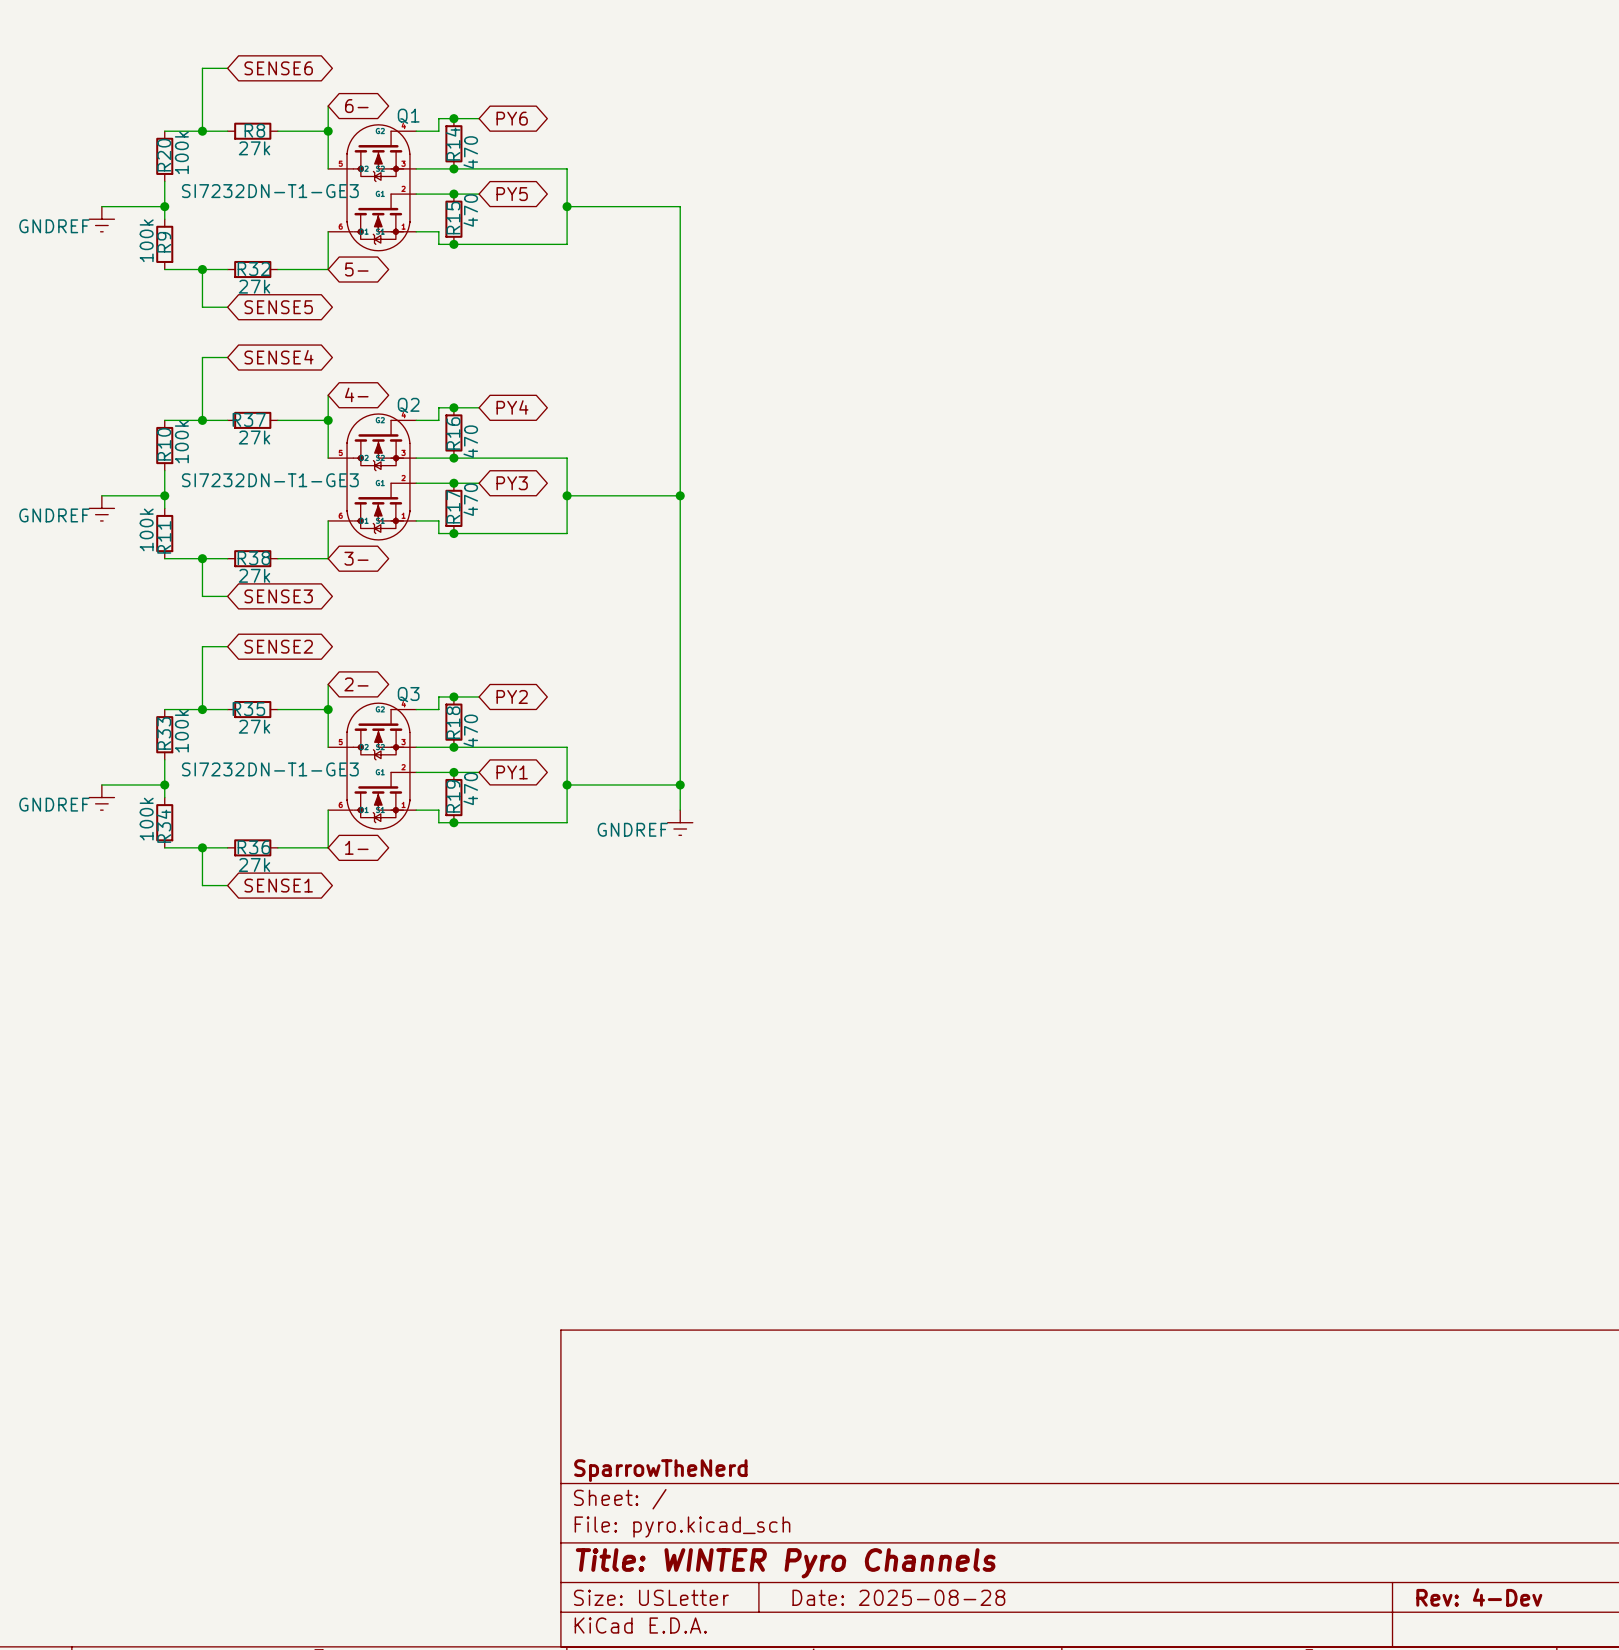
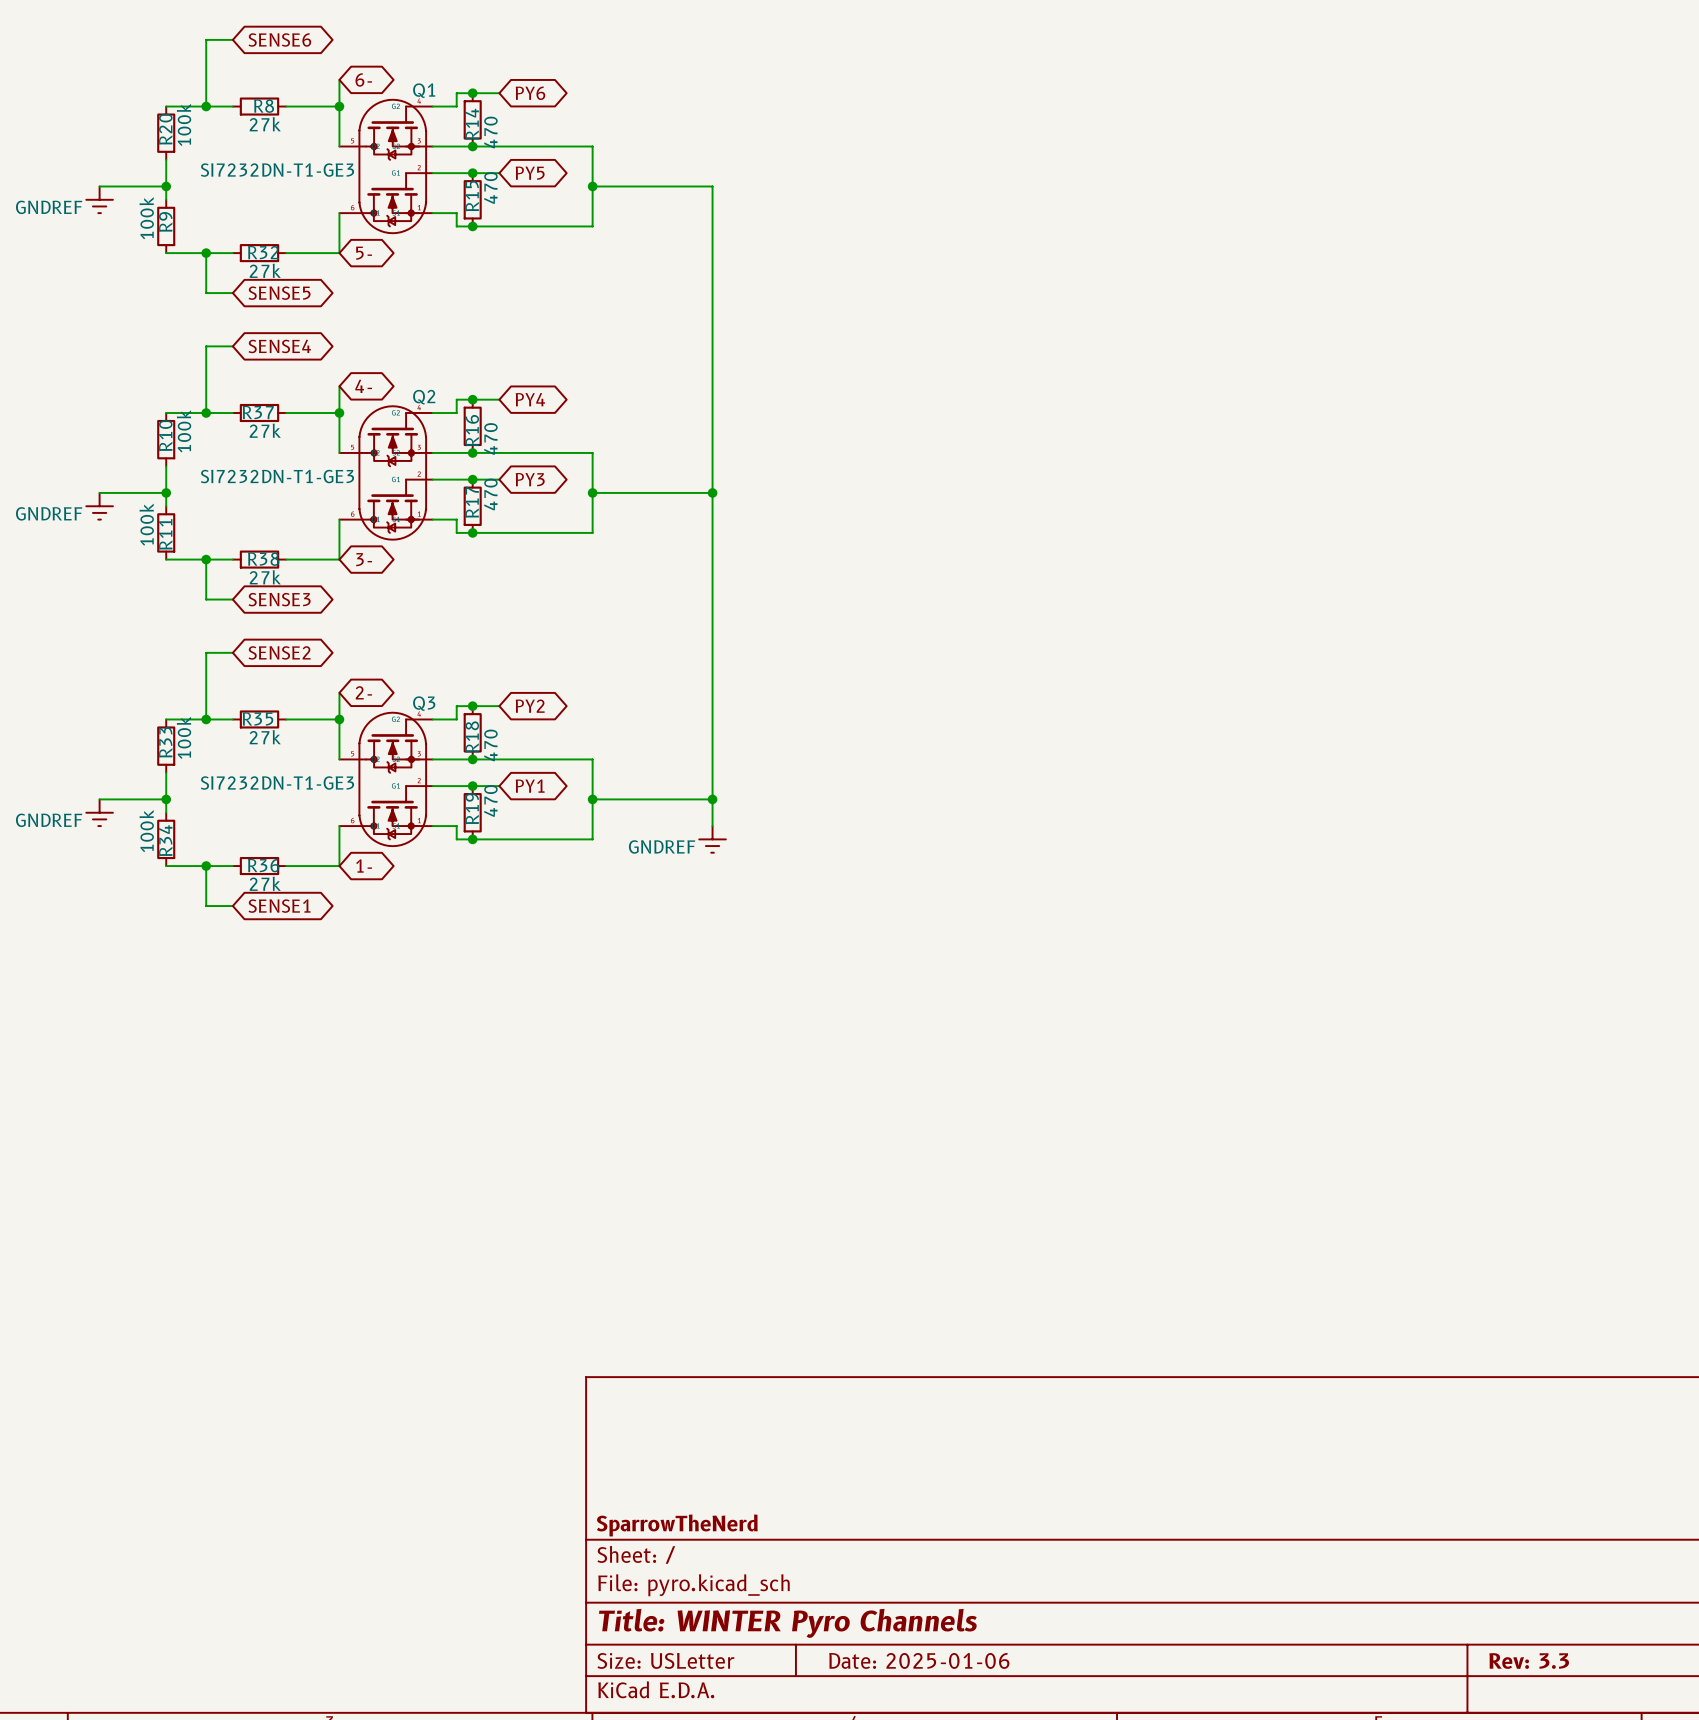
title block: Date: 2025-08-28 (898, 1597) -> Date: 2025-01-06 (919, 1660)
title block: Rev: 4-Dev (1479, 1597) -> Rev: 3.3 (1529, 1661)

